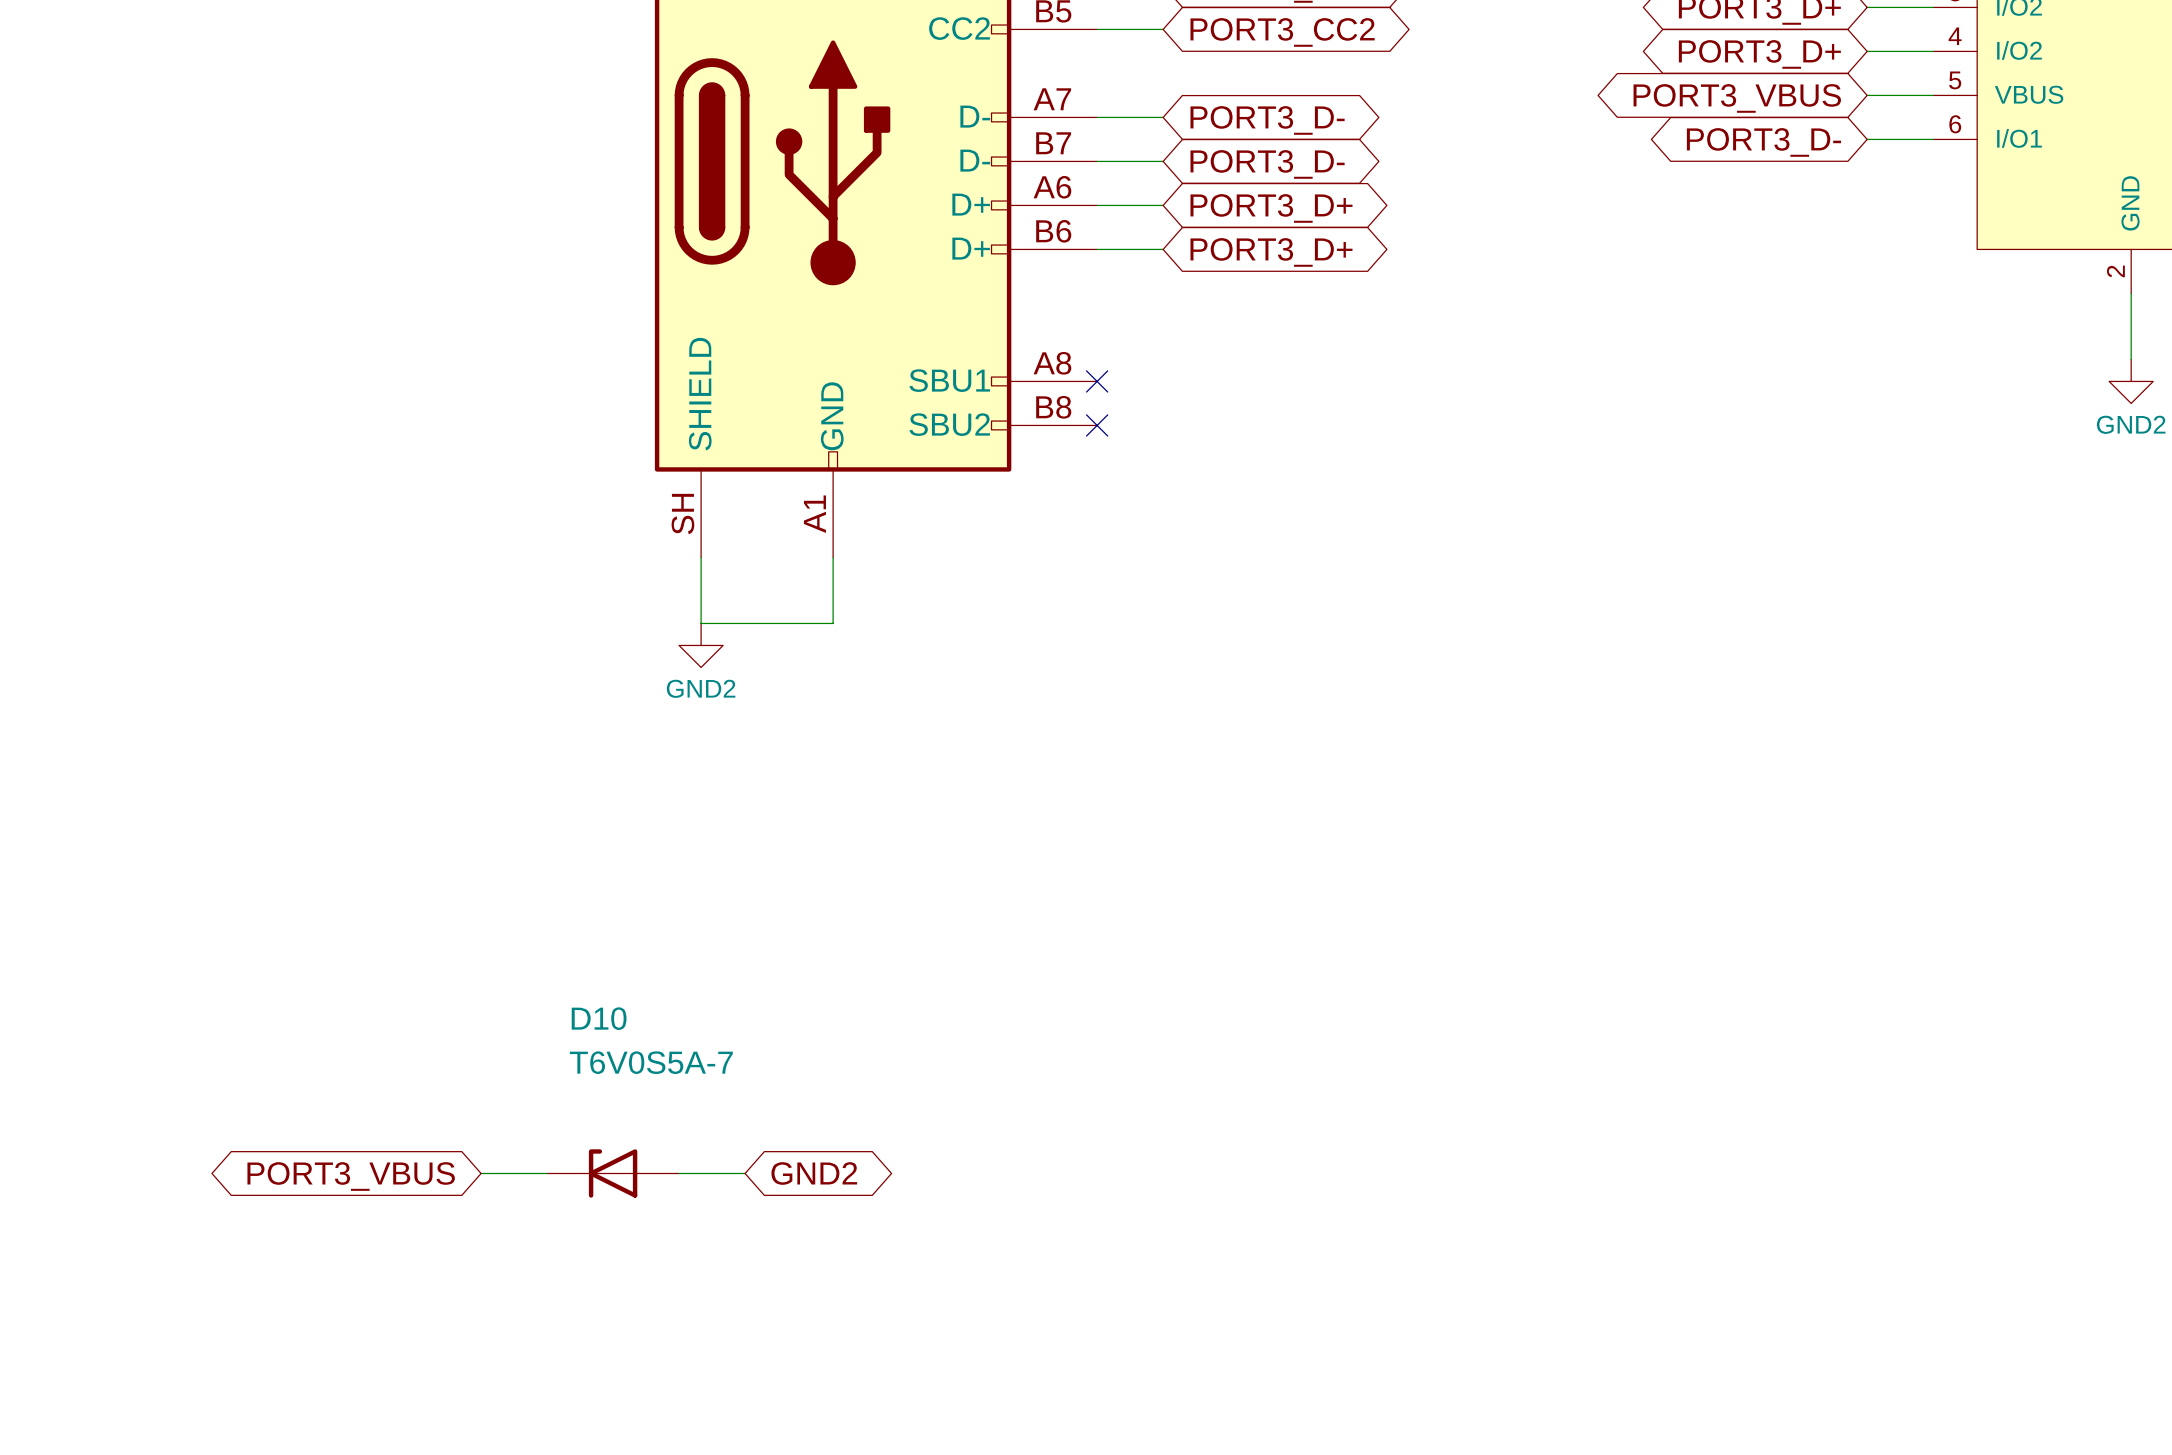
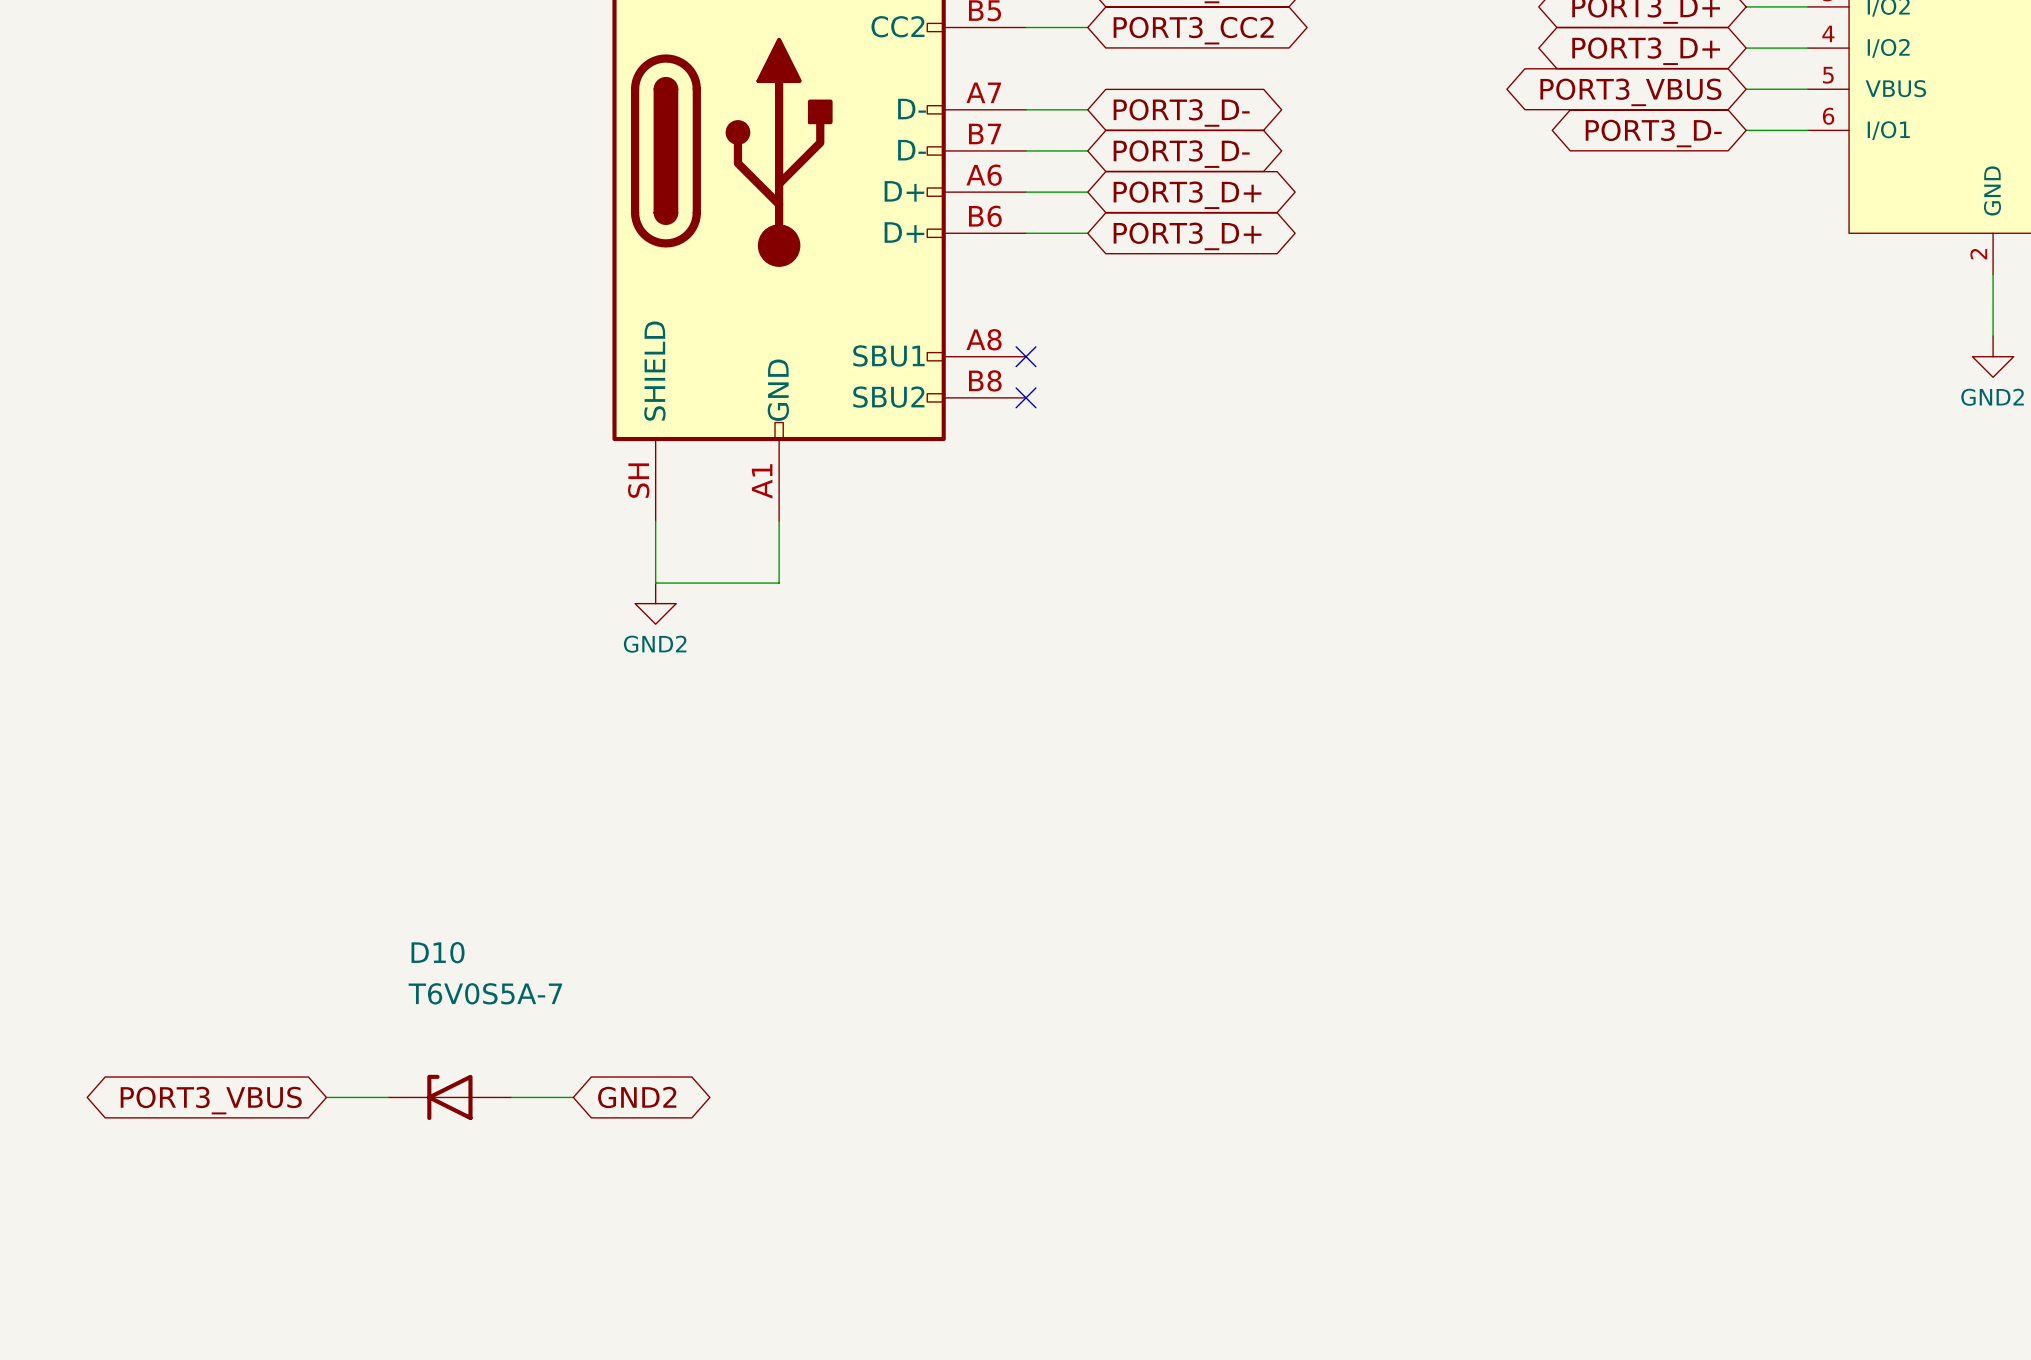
D10 position: (613, 1173) -> (449, 1097)
wire: (679, 1173) (745, 1173) -> (326, 1097) (388, 1097)
global label position: GND2 (814, 1173) -> GND2 (637, 1097)
global label position: PORT3_VBUS (351, 1176) -> PORT3_VBUS (211, 1100)

